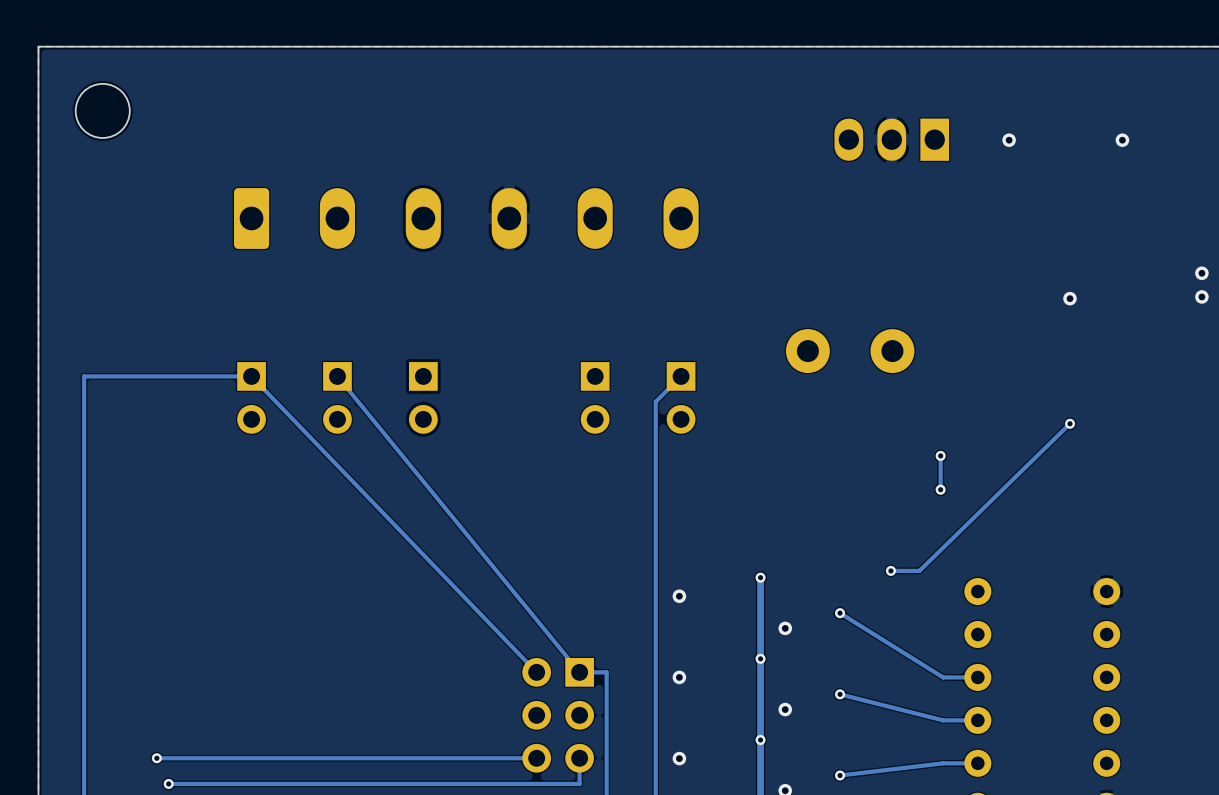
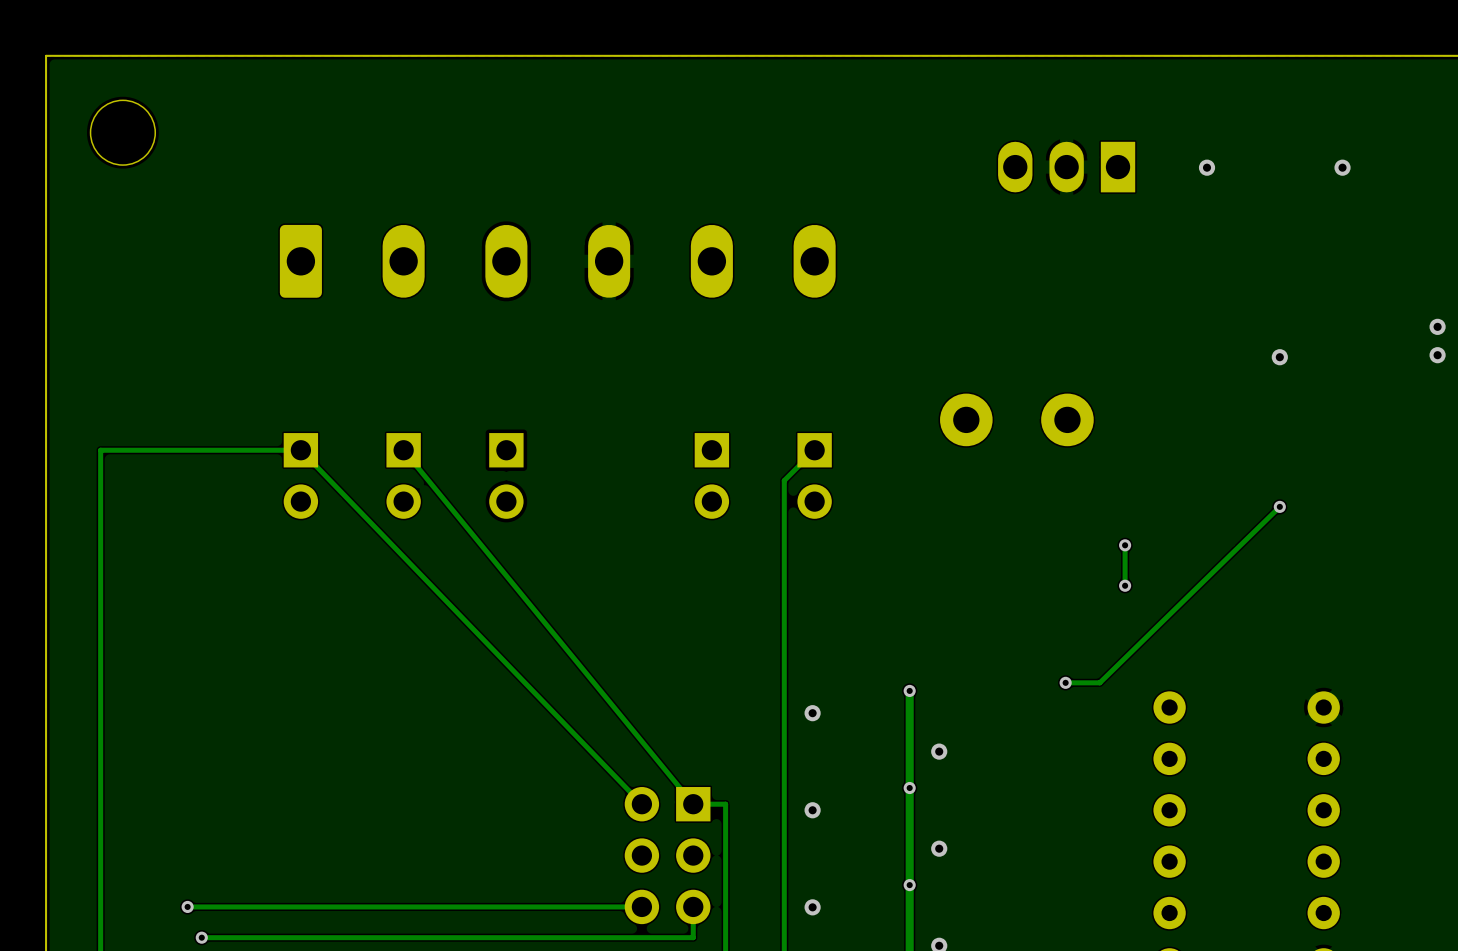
track: (840, 613) (943, 677) (977, 677) -> none
via: (840, 613) -> none
track: (840, 694) (943, 720) (977, 720) -> none
via: (840, 694) -> none
track: (977, 763) (943, 763) (840, 775) -> none
via: (840, 775) -> none

